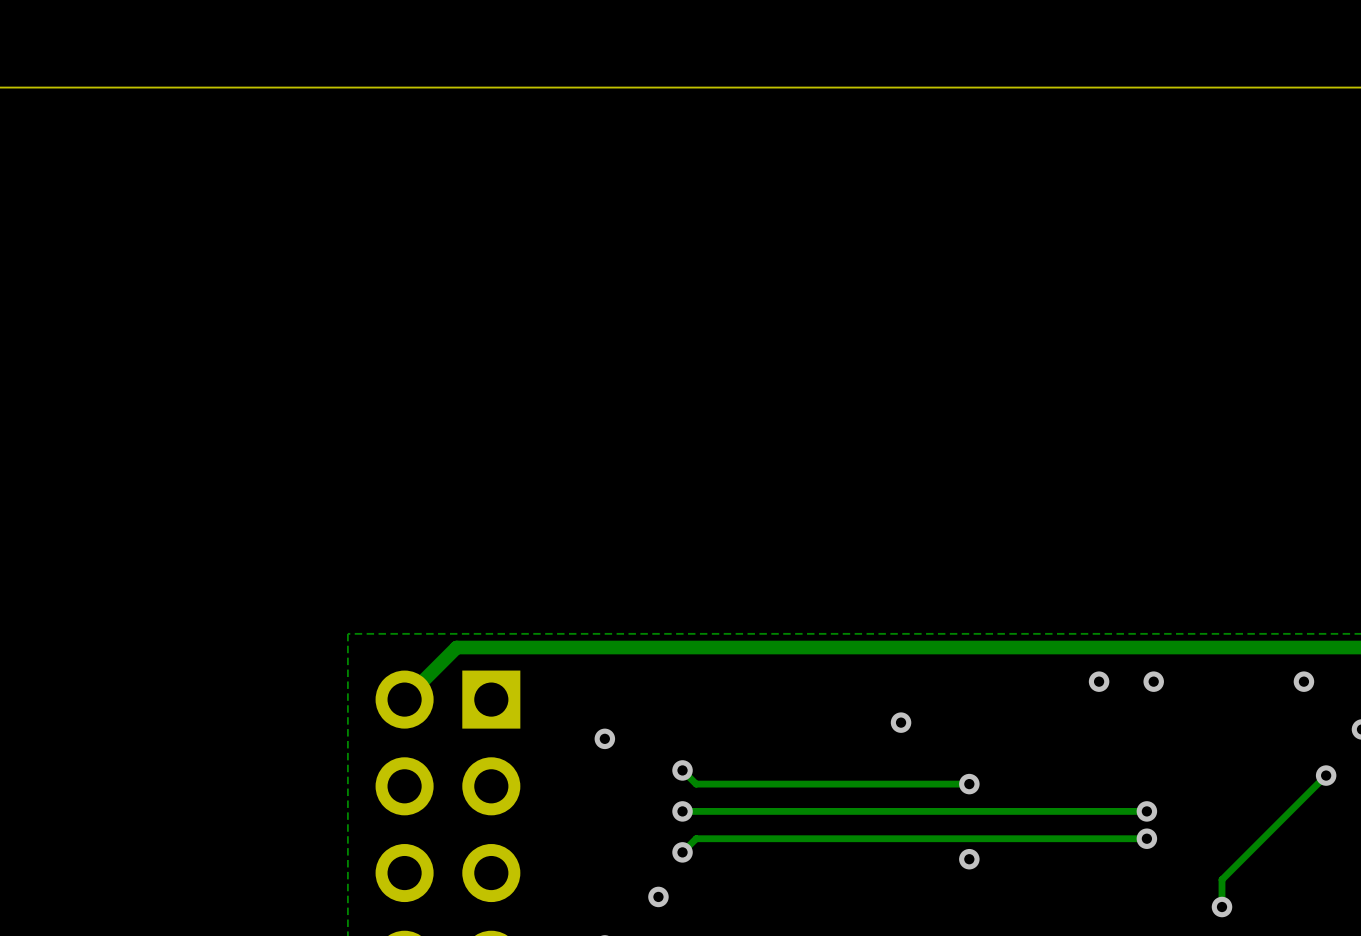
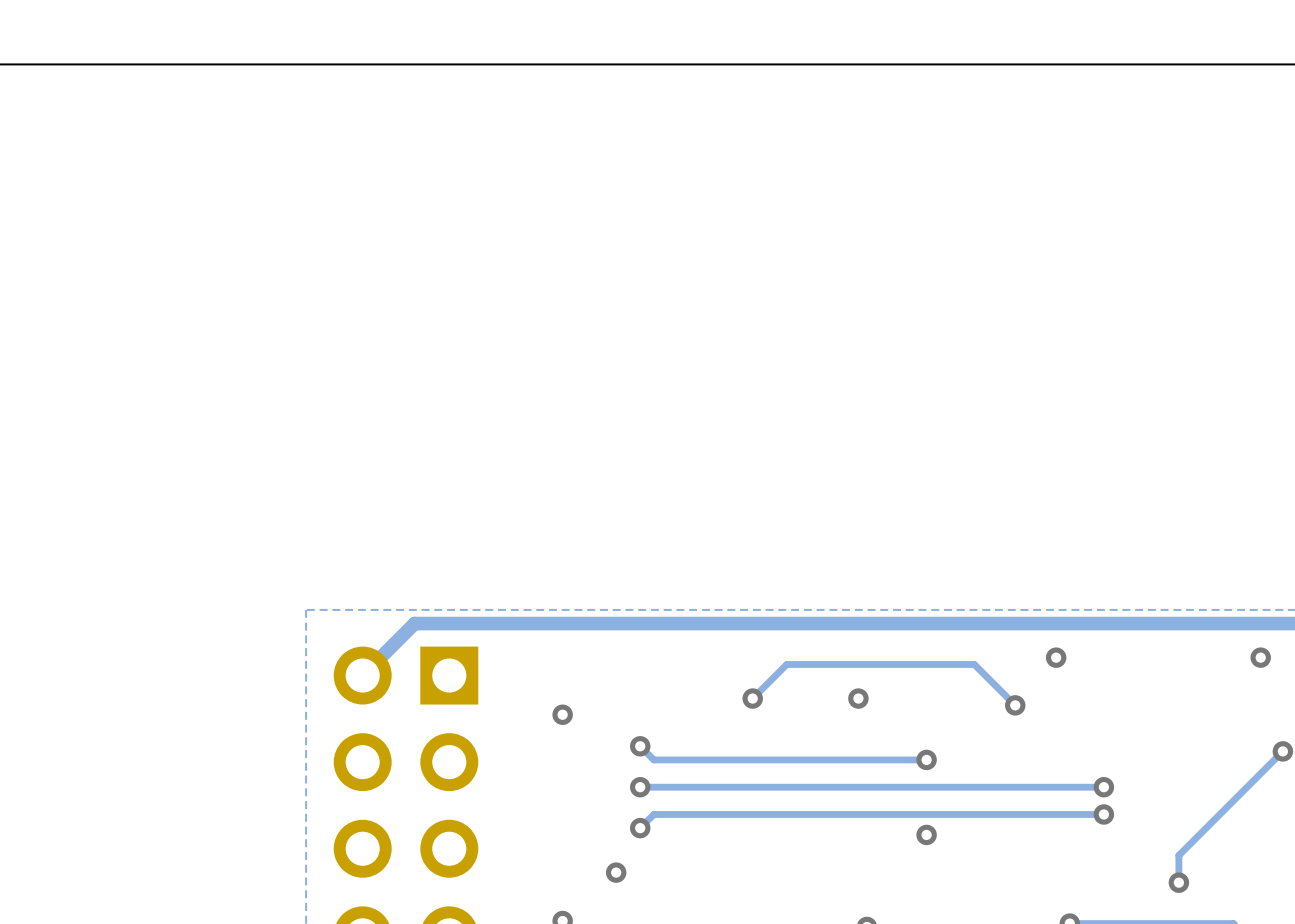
via position: (1153, 681) -> (1015, 705)
track: none -> (752, 698) (786, 664) (974, 664) (1015, 705)
via: none -> (752, 698)

